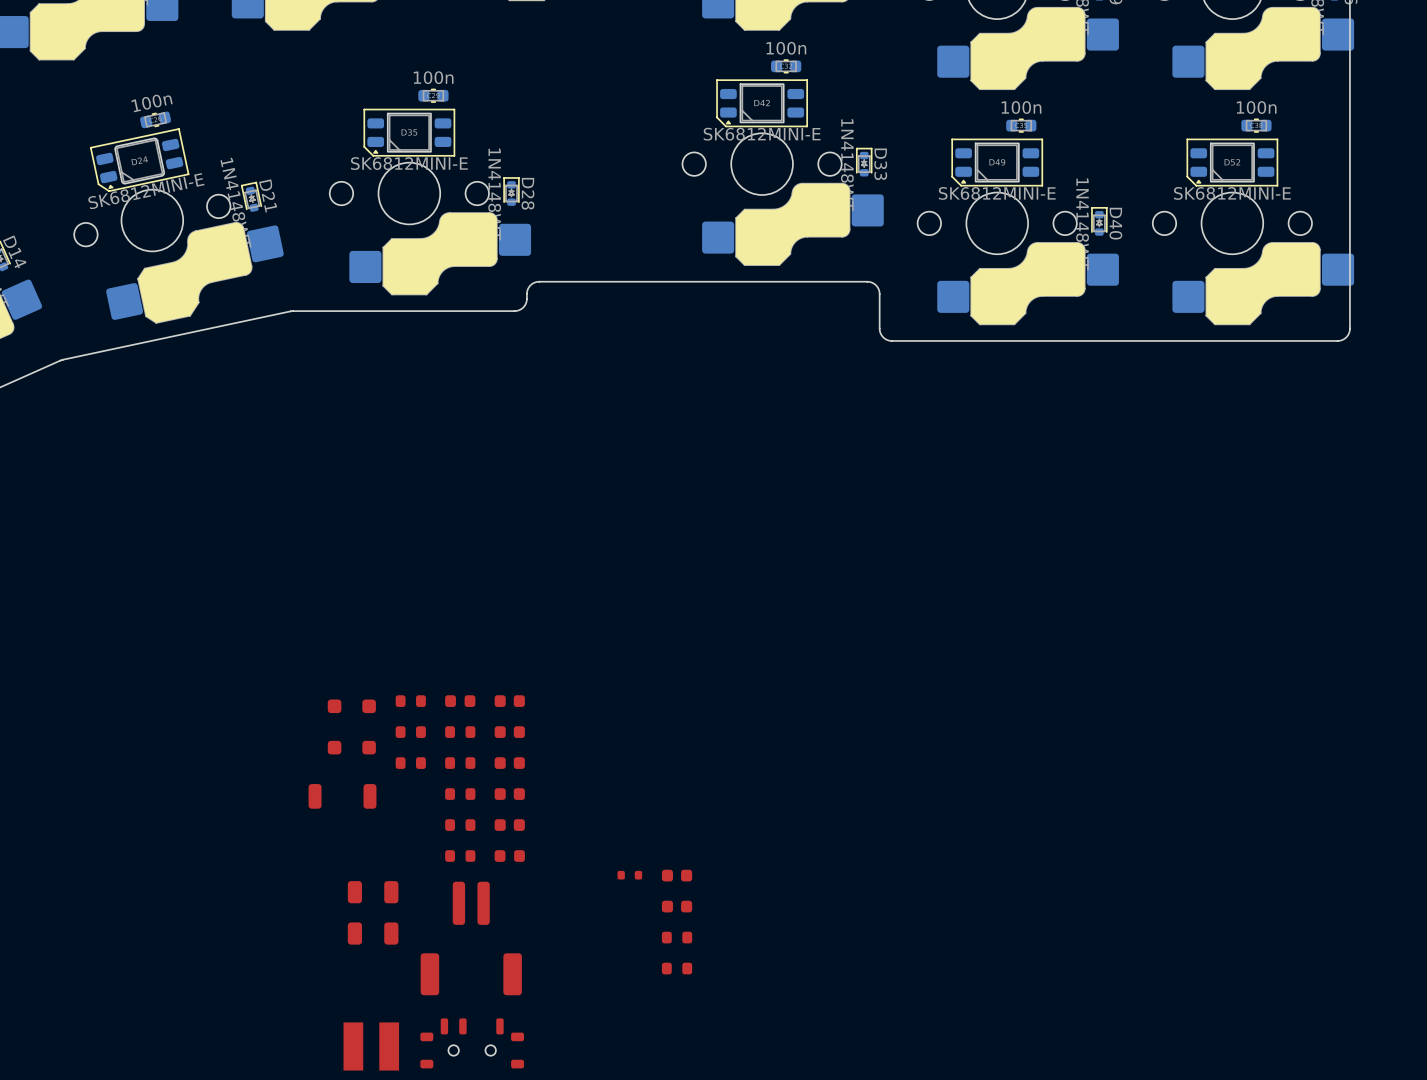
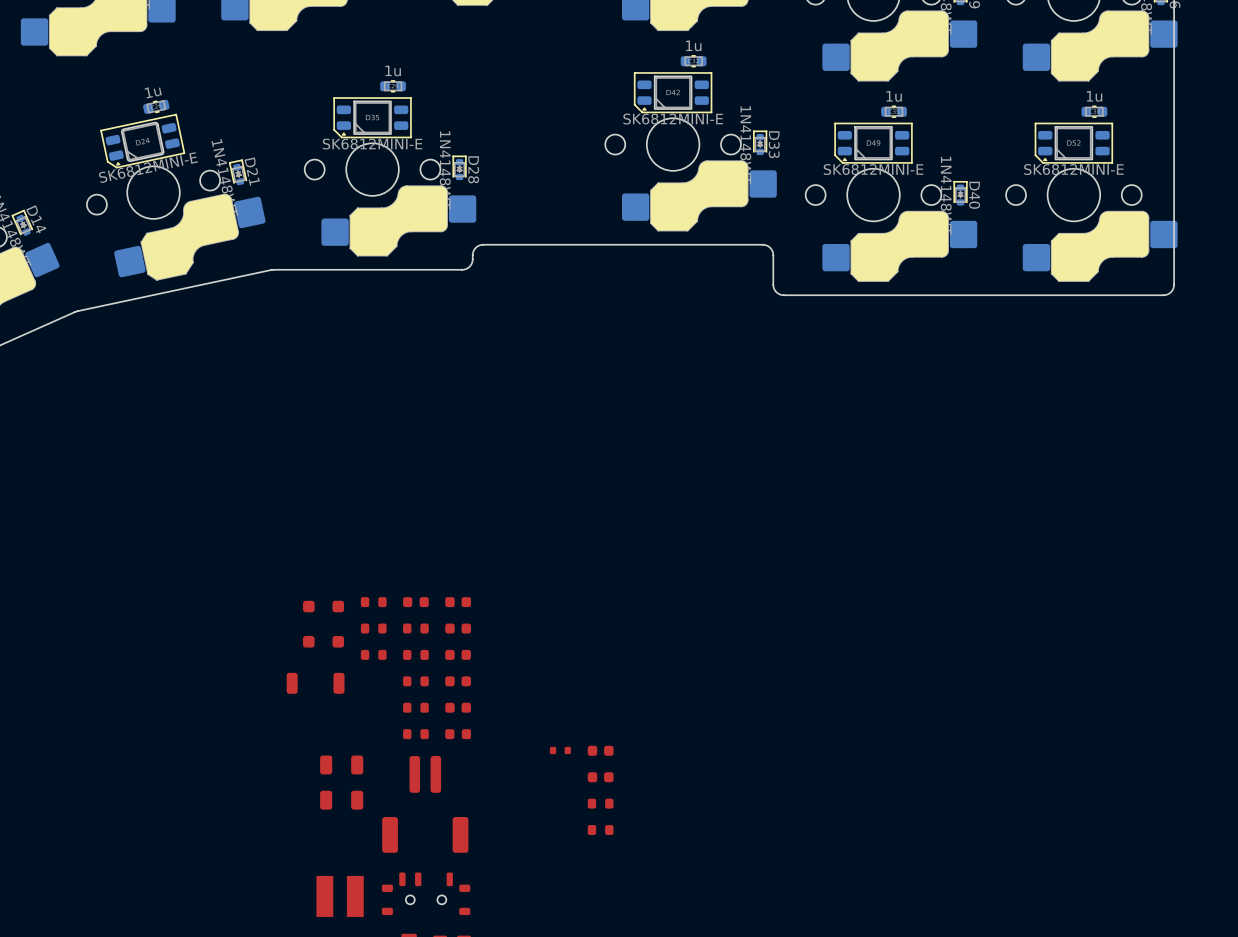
part value: 100n (786, 48) -> 1u (693, 45)
part value: 100n (433, 77) -> 1u (393, 70)
part value: 100n (152, 103) -> 1u (153, 92)
part value: 100n (1021, 107) -> 1u (894, 96)
part value: 100n (1256, 107) -> 1u (1094, 96)

